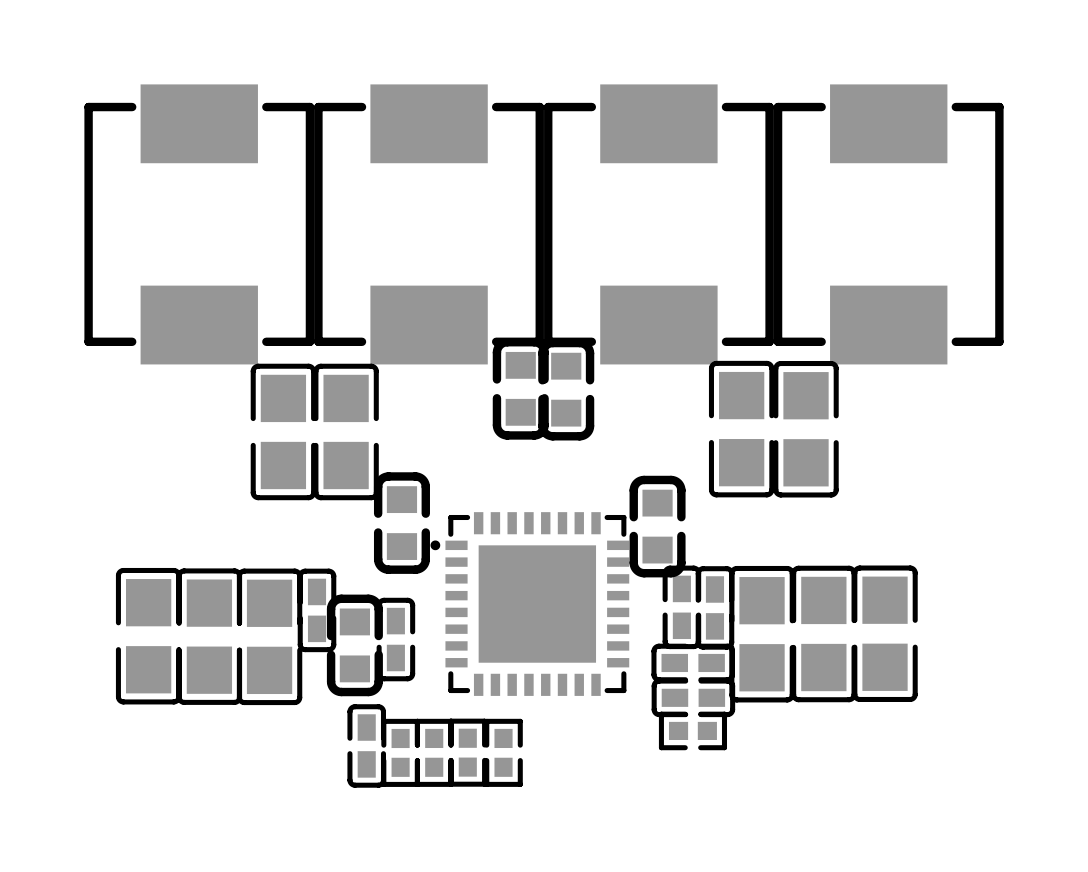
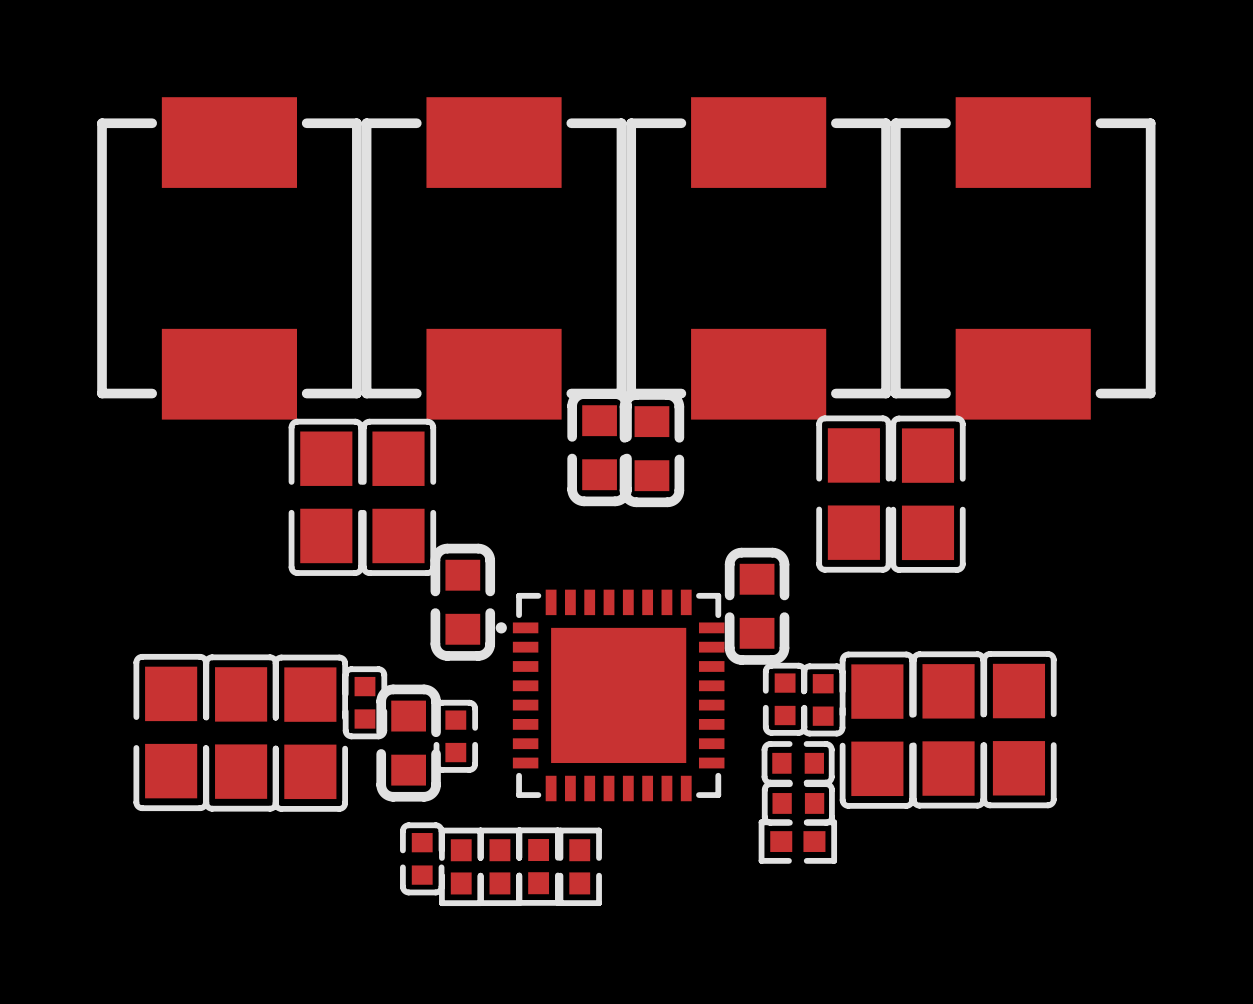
part footprint: [662, 565, 702, 650] -> [762, 662, 808, 736]
part footprint: [695, 566, 735, 650] -> [800, 663, 846, 737]
part footprint: [297, 568, 337, 653] -> [342, 666, 388, 740]
part footprint: [376, 597, 416, 682] -> [433, 699, 479, 773]
part footprint: [651, 643, 735, 683] -> [761, 741, 835, 786]
part footprint: [651, 678, 736, 718] -> [761, 781, 835, 826]
part footprint: [347, 704, 386, 788] -> [400, 822, 445, 896]

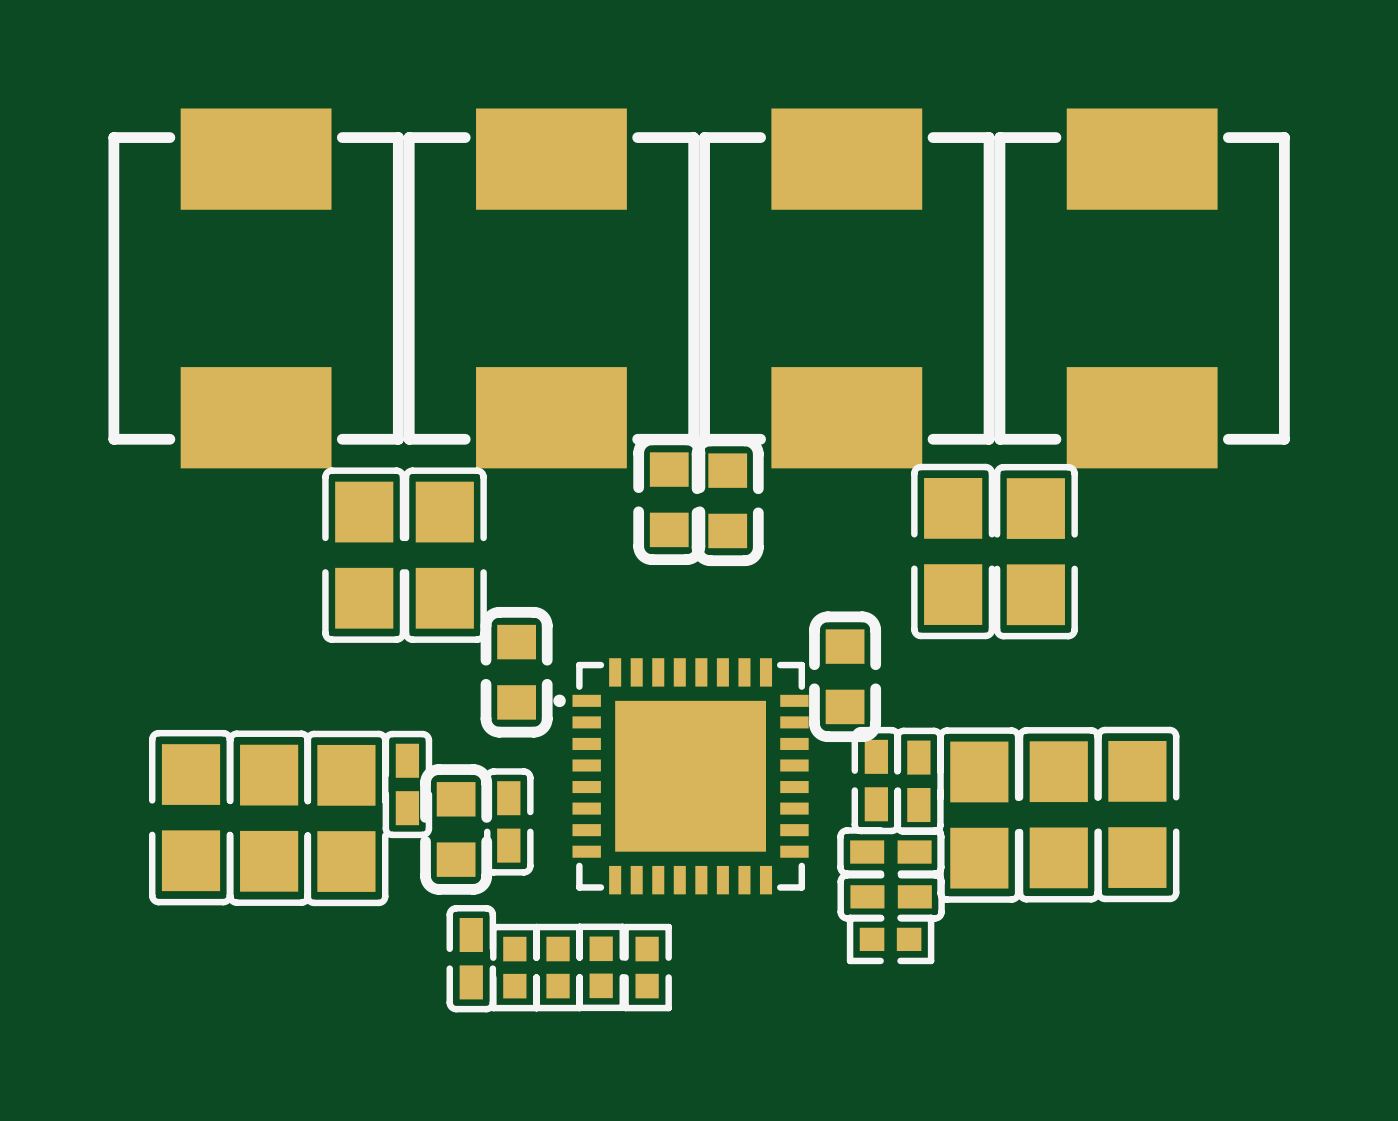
part footprint: [762, 662, 808, 736] -> [851, 726, 902, 835]
part footprint: [800, 663, 846, 737] -> [894, 727, 944, 835]
part footprint: [342, 666, 388, 740] -> [382, 730, 433, 839]
part footprint: [433, 699, 479, 773] -> [484, 768, 534, 876]
part footprint: [761, 741, 835, 786] -> [837, 827, 945, 877]
part footprint: [761, 781, 835, 826] -> [837, 872, 945, 922]
part footprint: [400, 822, 445, 896] -> [446, 905, 497, 1013]

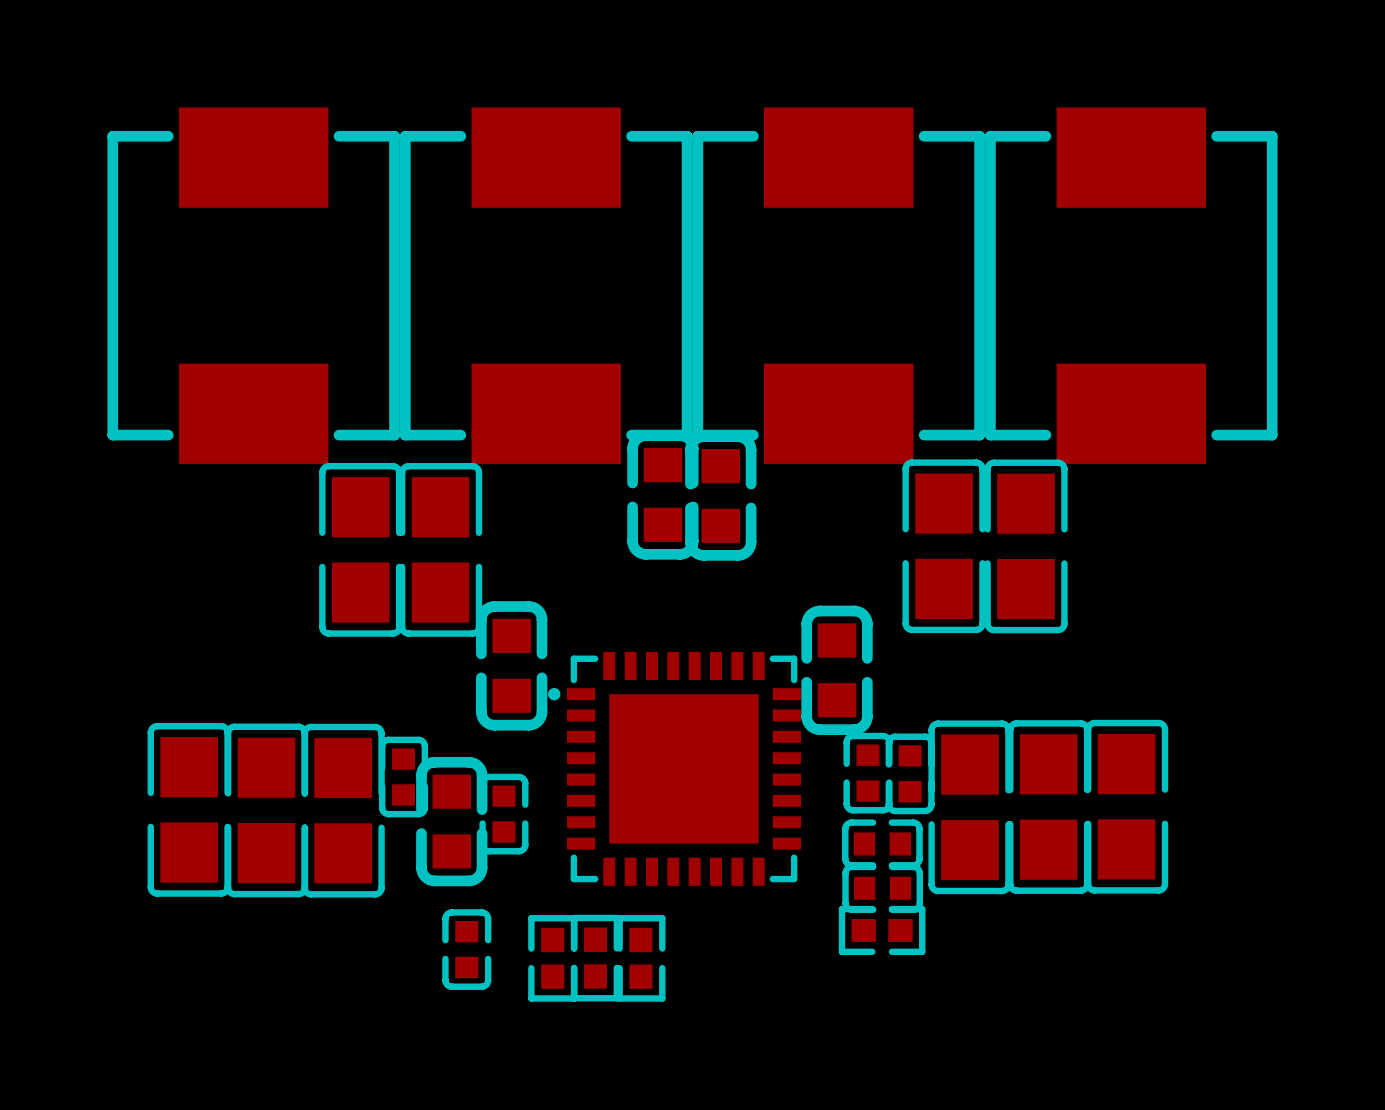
part footprint: [851, 726, 902, 835] -> [843, 732, 893, 814]
part footprint: [894, 727, 944, 835] -> [885, 733, 935, 815]
part footprint: [382, 730, 433, 839] -> [378, 736, 429, 818]
part footprint: [484, 768, 534, 876] -> [479, 773, 529, 855]
part footprint: [837, 827, 945, 877] -> [842, 819, 923, 869]
part footprint: [837, 872, 945, 922] -> [842, 863, 924, 913]
part footprint: [446, 905, 497, 1013] -> [442, 909, 492, 990]
part: (514, 967) -> none

